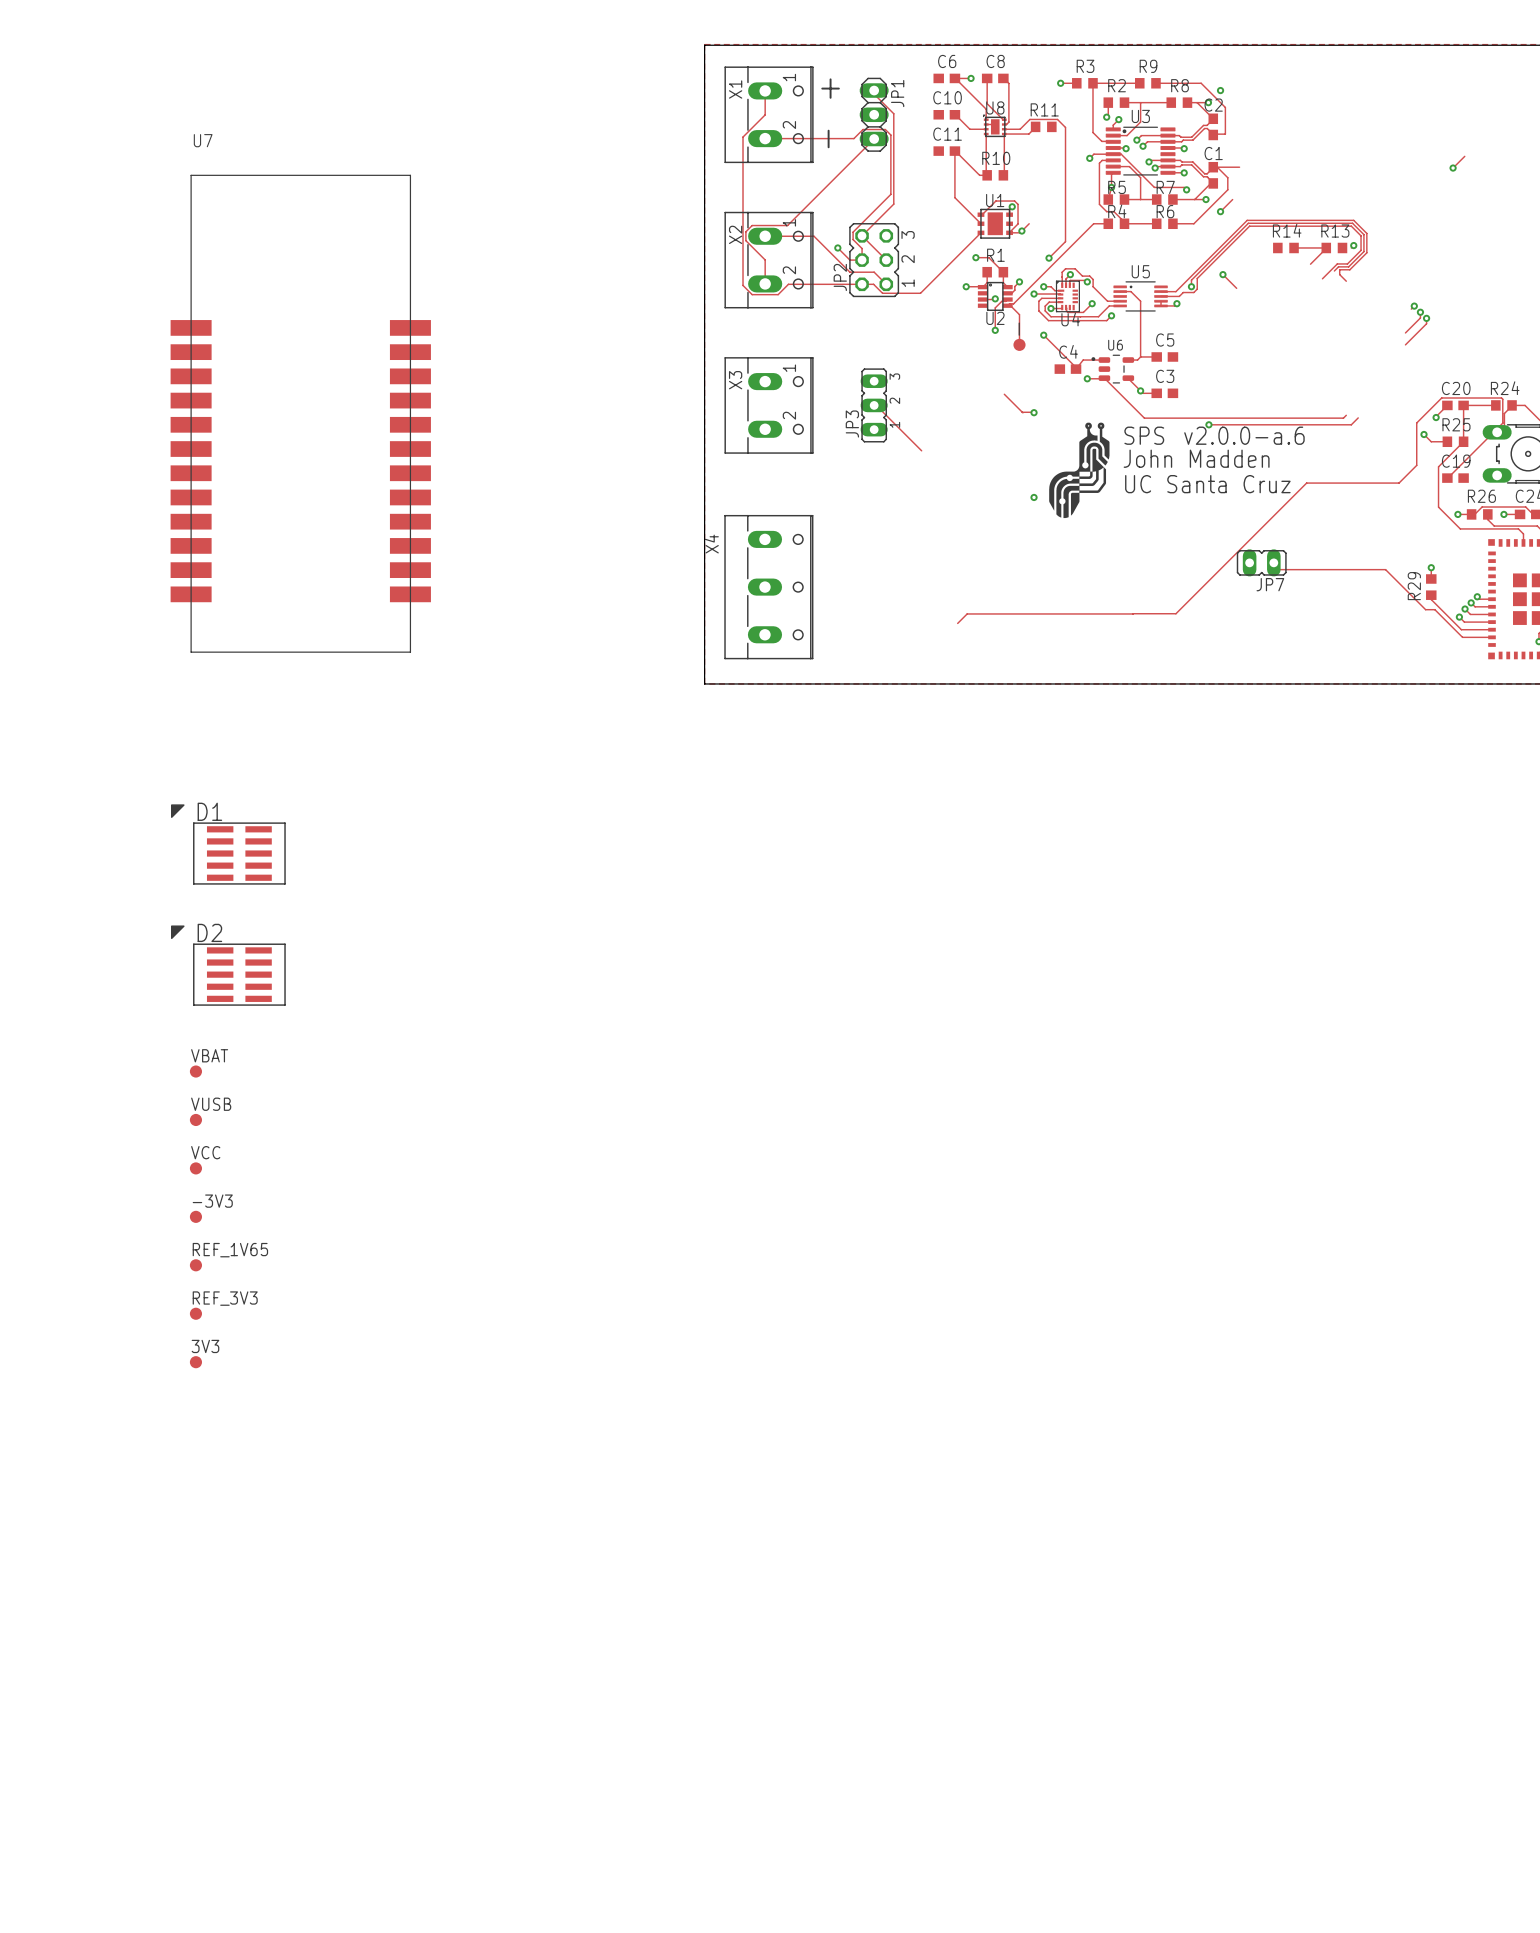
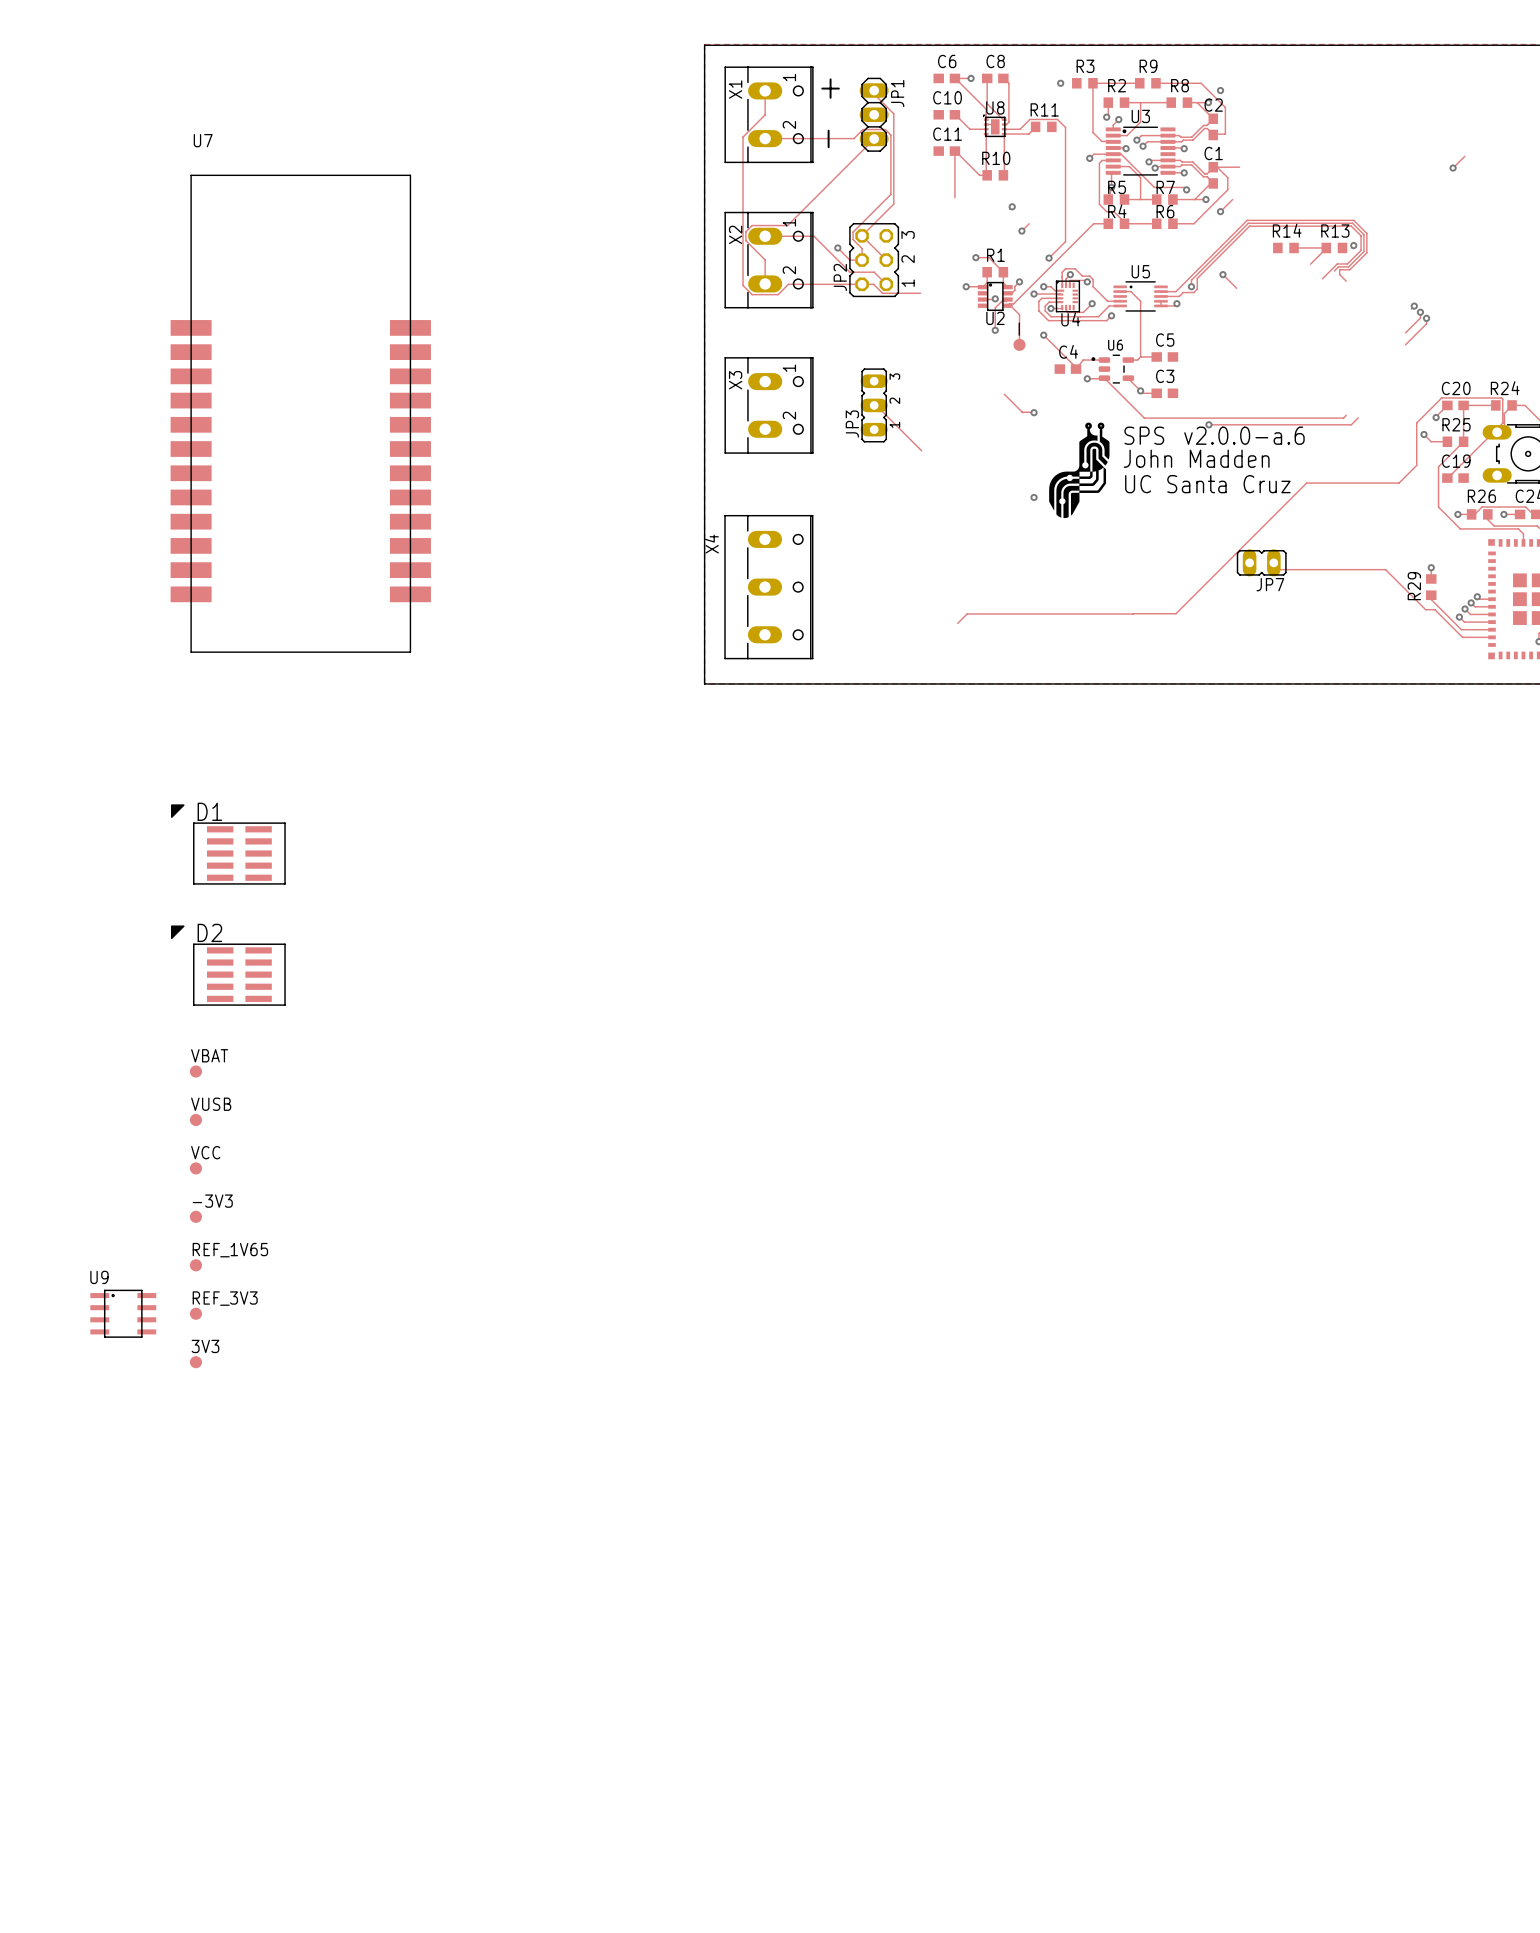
track: (1060, 83) (1076, 83) -> none
track: (954, 197) (980, 223) -> none
track: (980, 214) (995, 201) (1014, 201) (1018, 204) (1018, 223) (1009, 232) (1020, 232) -> none
U1: (995, 223) -> none
track: (980, 232) (920, 293) -> none
U9: none -> (123, 1313)

